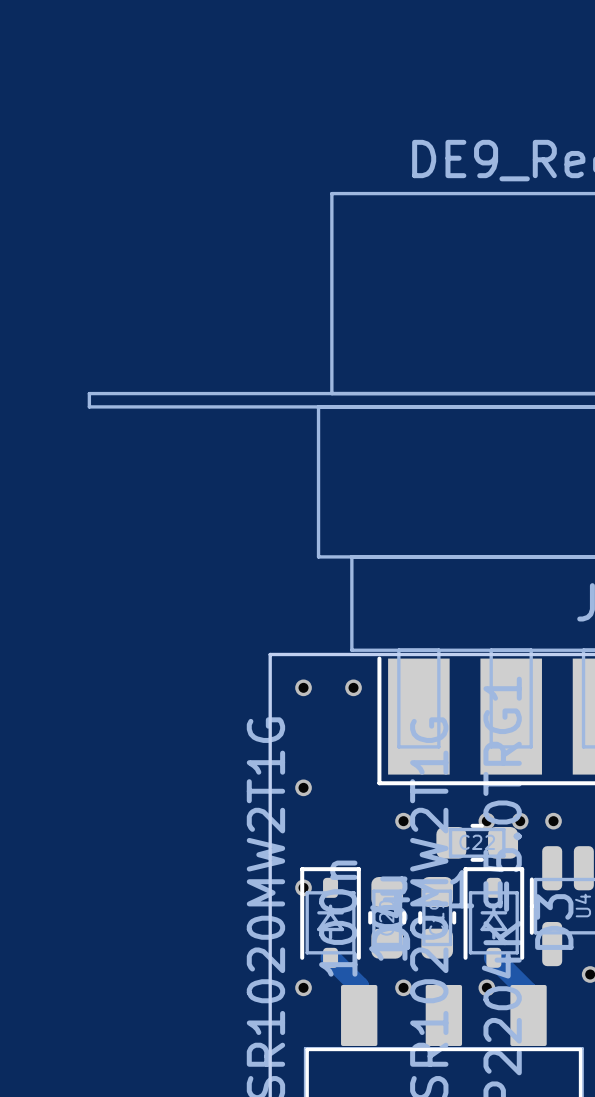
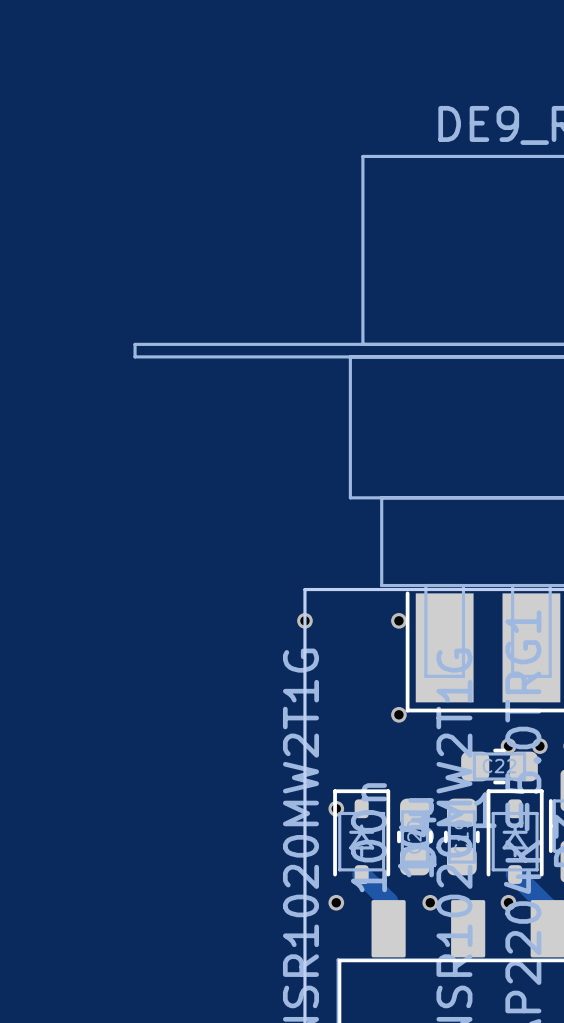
via: none -> (304, 620)
via: (303, 687) -> none
via position: (353, 687) -> (398, 620)
via: (303, 787) -> none
via: none -> (398, 714)
via: (403, 821) -> none

